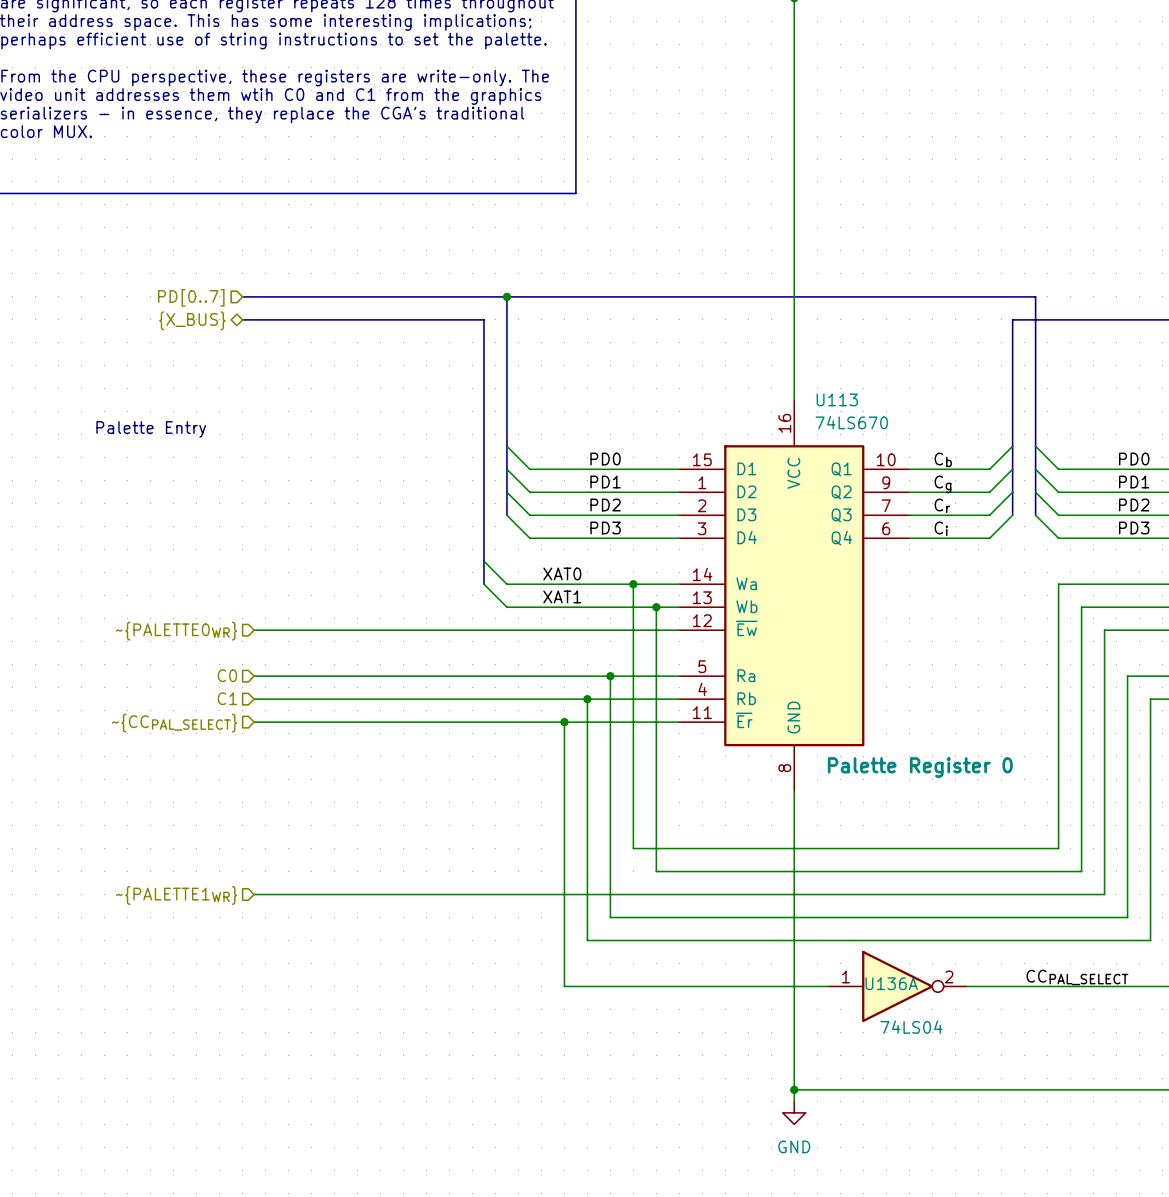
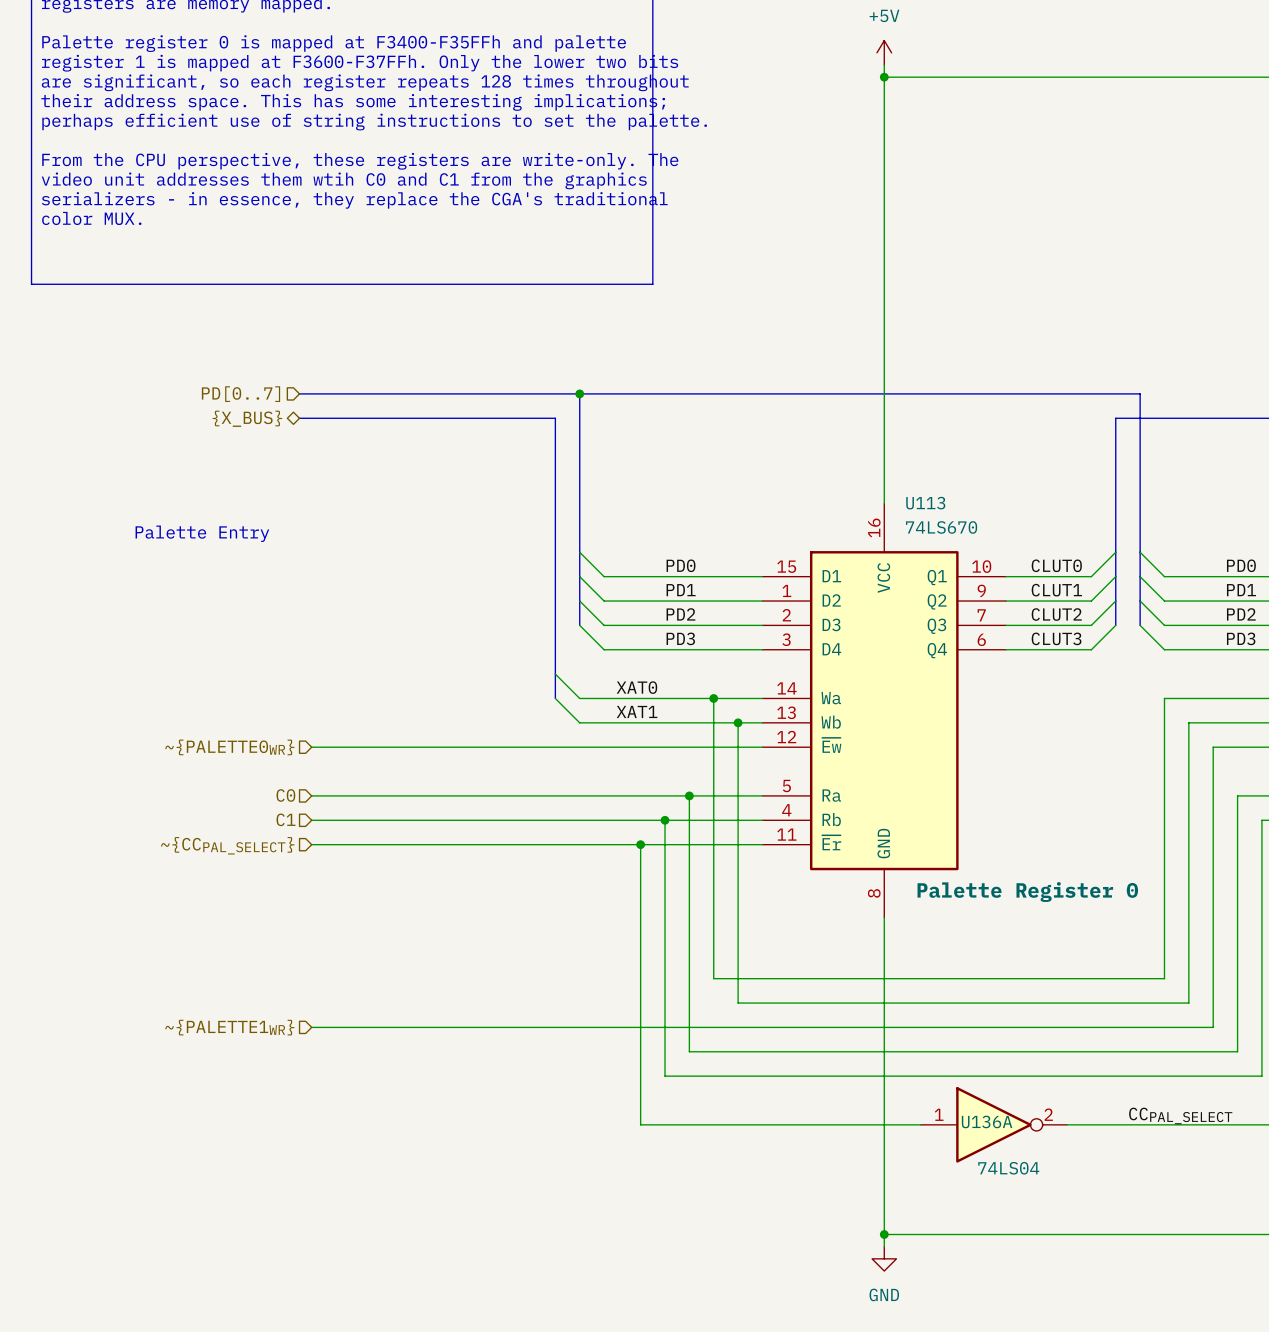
label: Cb (943, 459) -> CLUT0 (1056, 565)
label: Cg (943, 484) -> CLUT1 (1056, 590)
label: Cr (942, 505) -> CLUT2 (1056, 614)
label: Ci (941, 528) -> CLUT3 (1056, 638)

